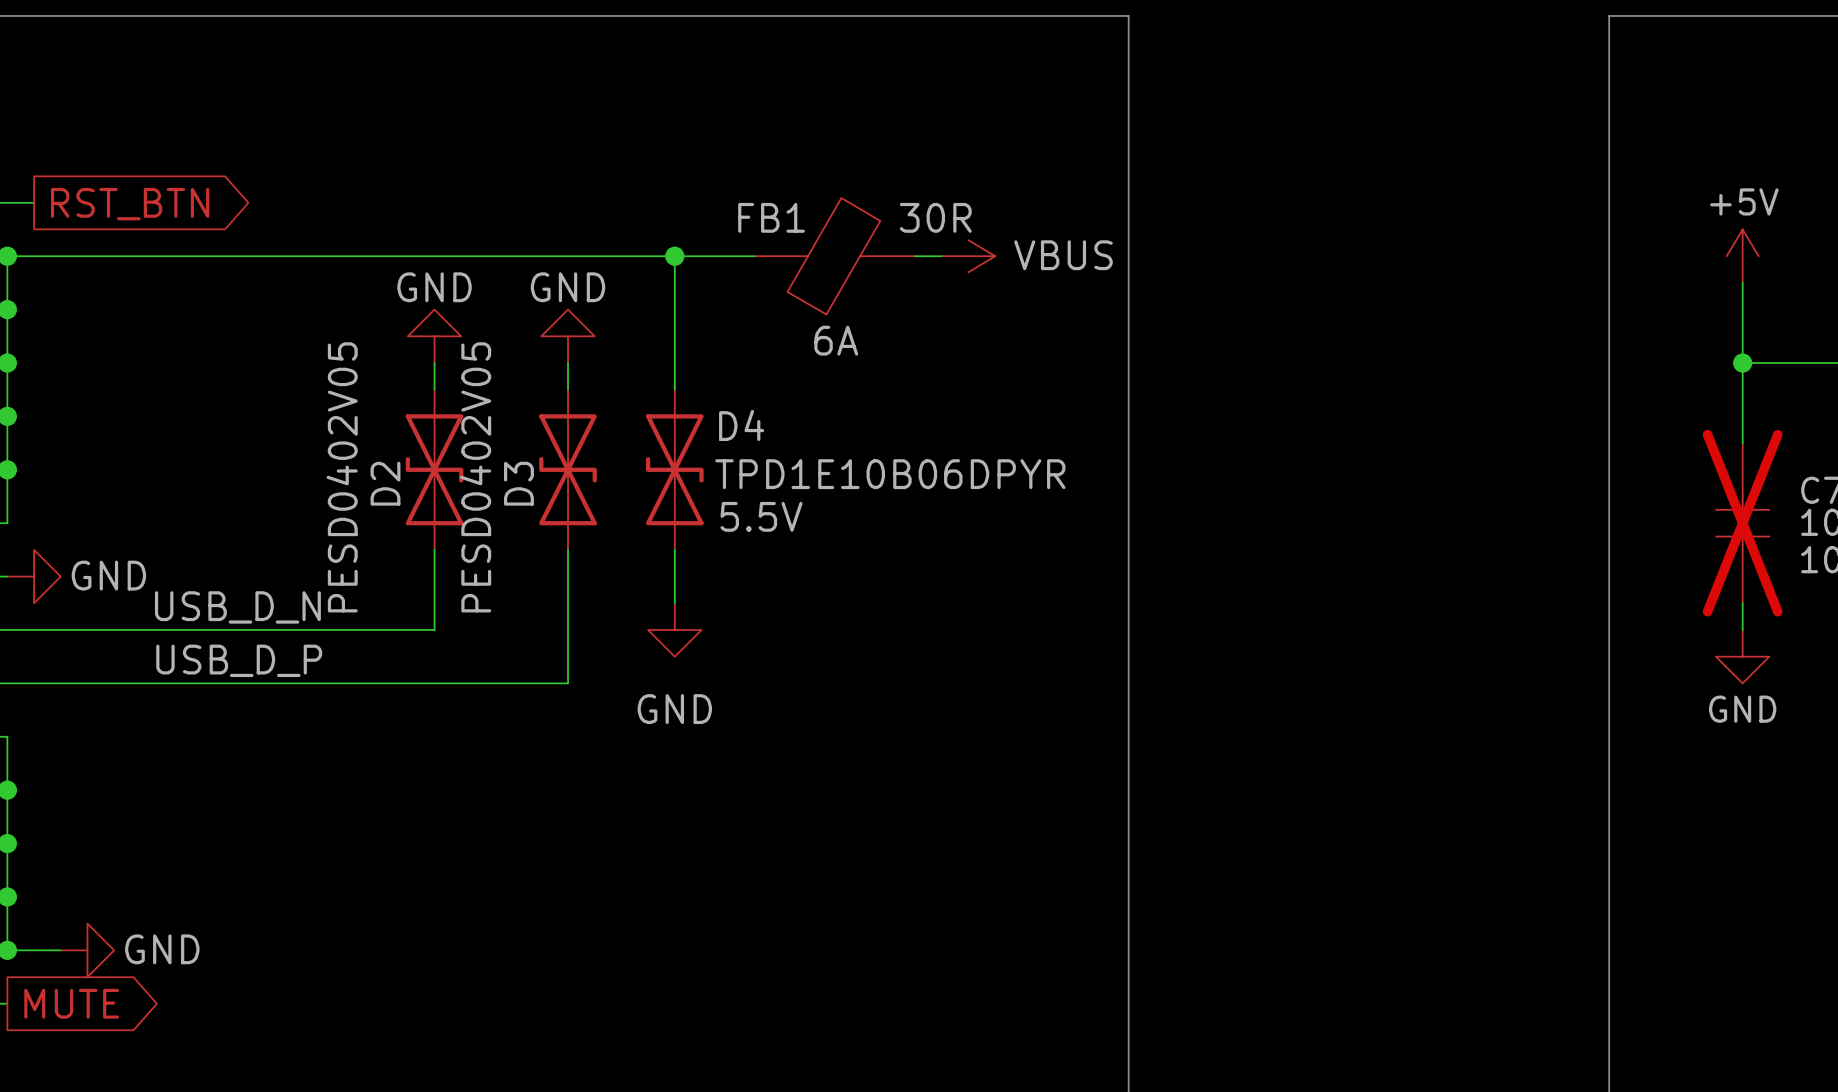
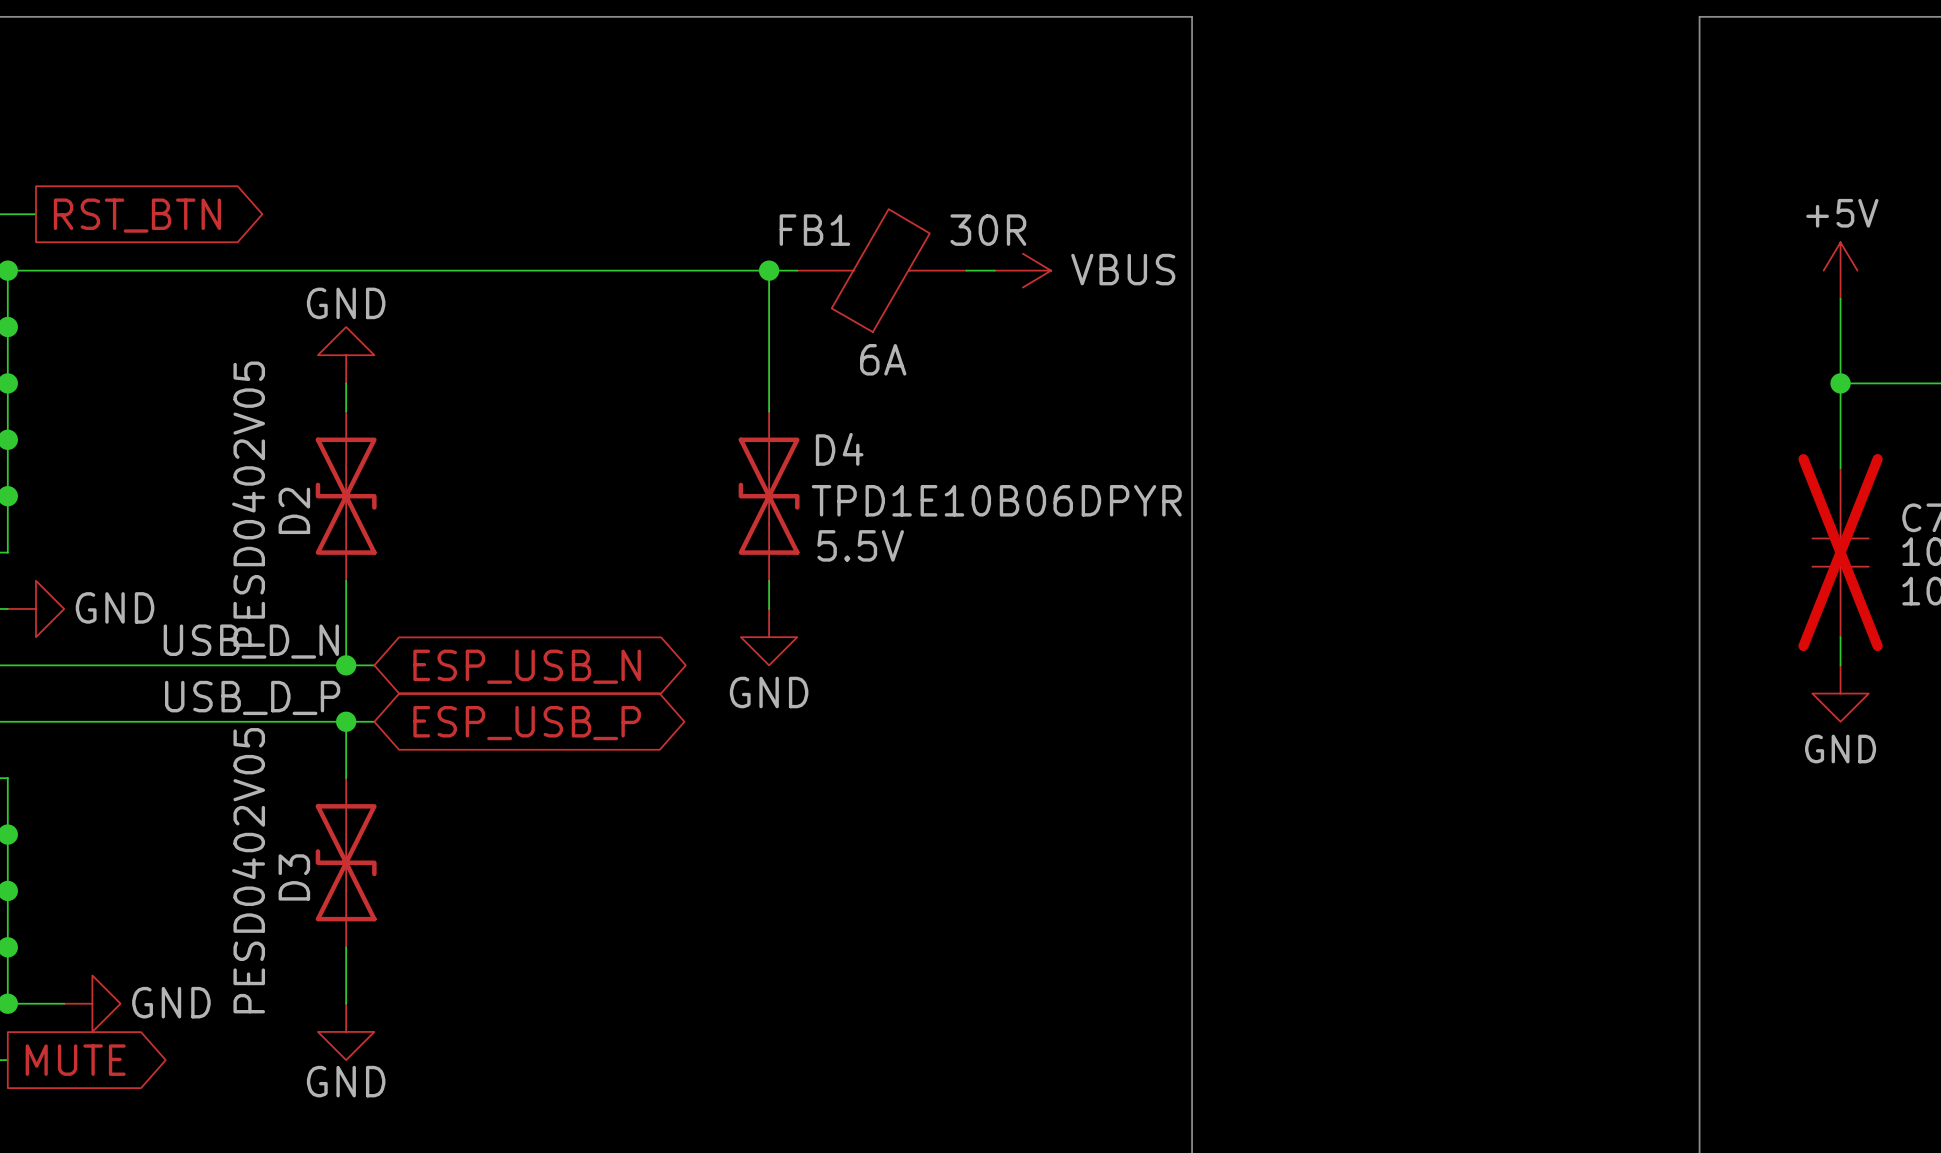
wire: (674, 256) (674, 389) -> (769, 270) (769, 411)
junction position: (674, 256) -> (769, 270)
power symbol position: GND (434, 336) -> GND (346, 355)
power symbol: GND (568, 336) -> none
wire: (434, 363) (434, 389) -> (346, 383) (346, 411)
wire: (568, 363) (568, 389) -> (769, 580) (769, 608)
D2 position: (434, 469) -> (346, 496)
D3 position: (568, 469) -> (346, 862)
D4 position: (674, 469) -> (769, 496)
wire: none -> (346, 580) (346, 665)
wire: (434, 549) (434, 629) (354, 629) -> none
wire: (568, 549) (568, 683) (354, 683) -> none
wire: (674, 549) (674, 603) -> (346, 721) (346, 778)
junction: none -> (346, 665)
power symbol position: GND (674, 629) -> GND (769, 637)
global label: none -> ESP_USB_N (527, 666)
junction: none -> (346, 721)
global label: none -> ESP_USB_P (527, 723)
power symbol text position: GND (674, 709) -> GND (769, 692)
wire: none -> (346, 947) (346, 1003)
power symbol: none -> GND (346, 1031)

